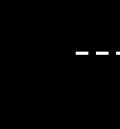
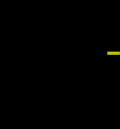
board edge: (75, 53) (107, 53) -> none

